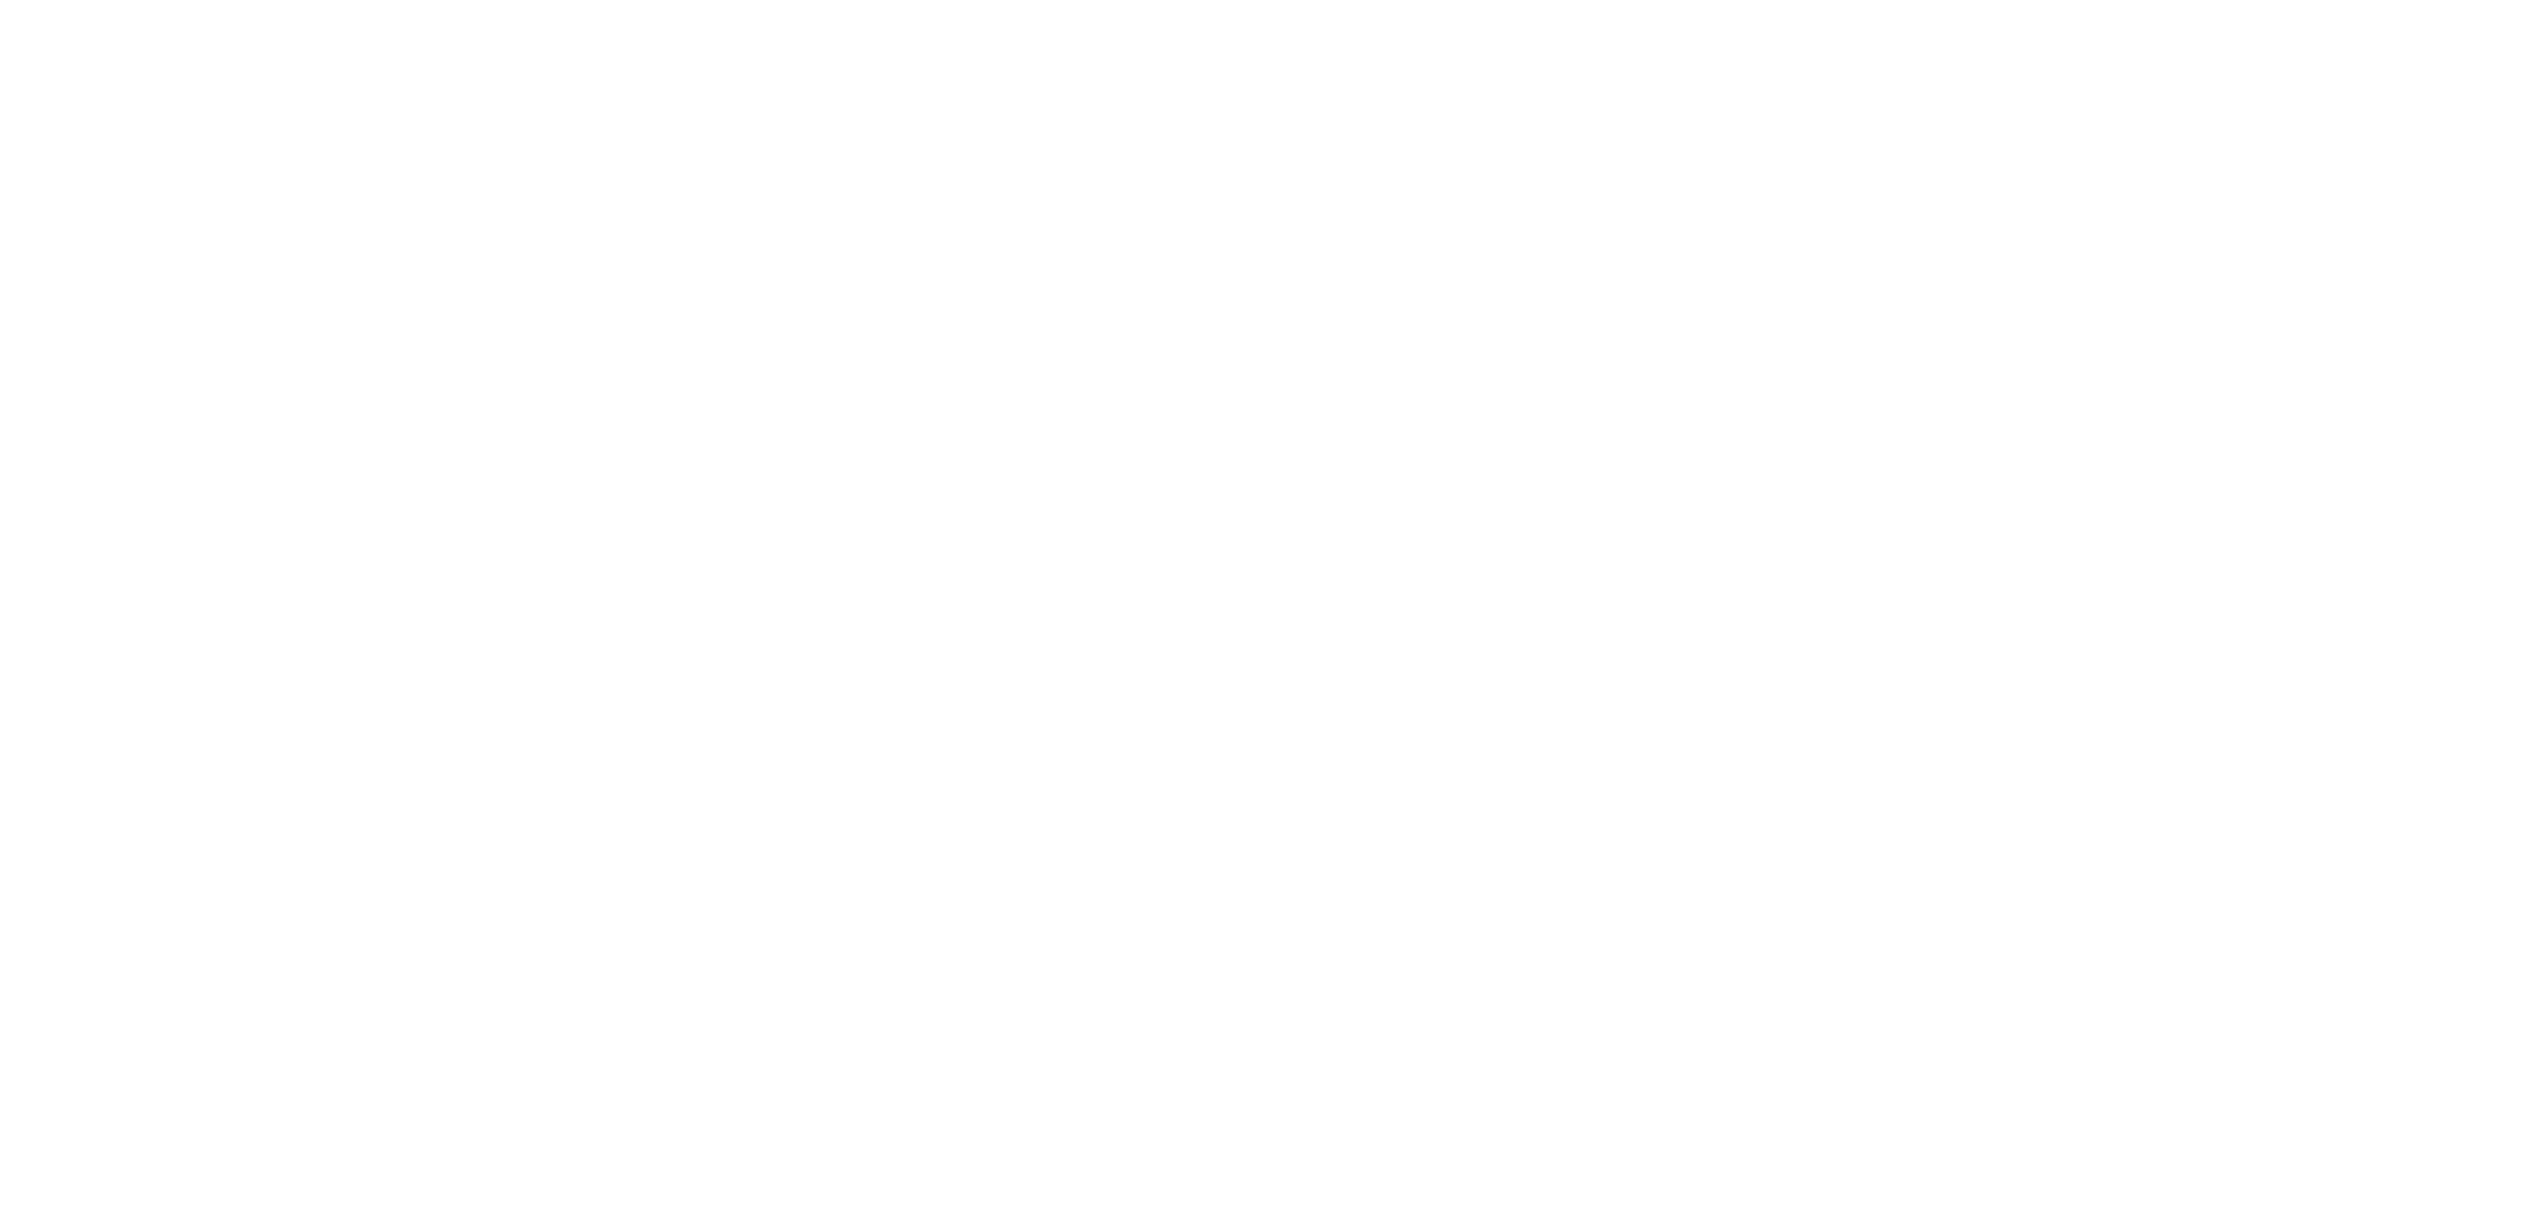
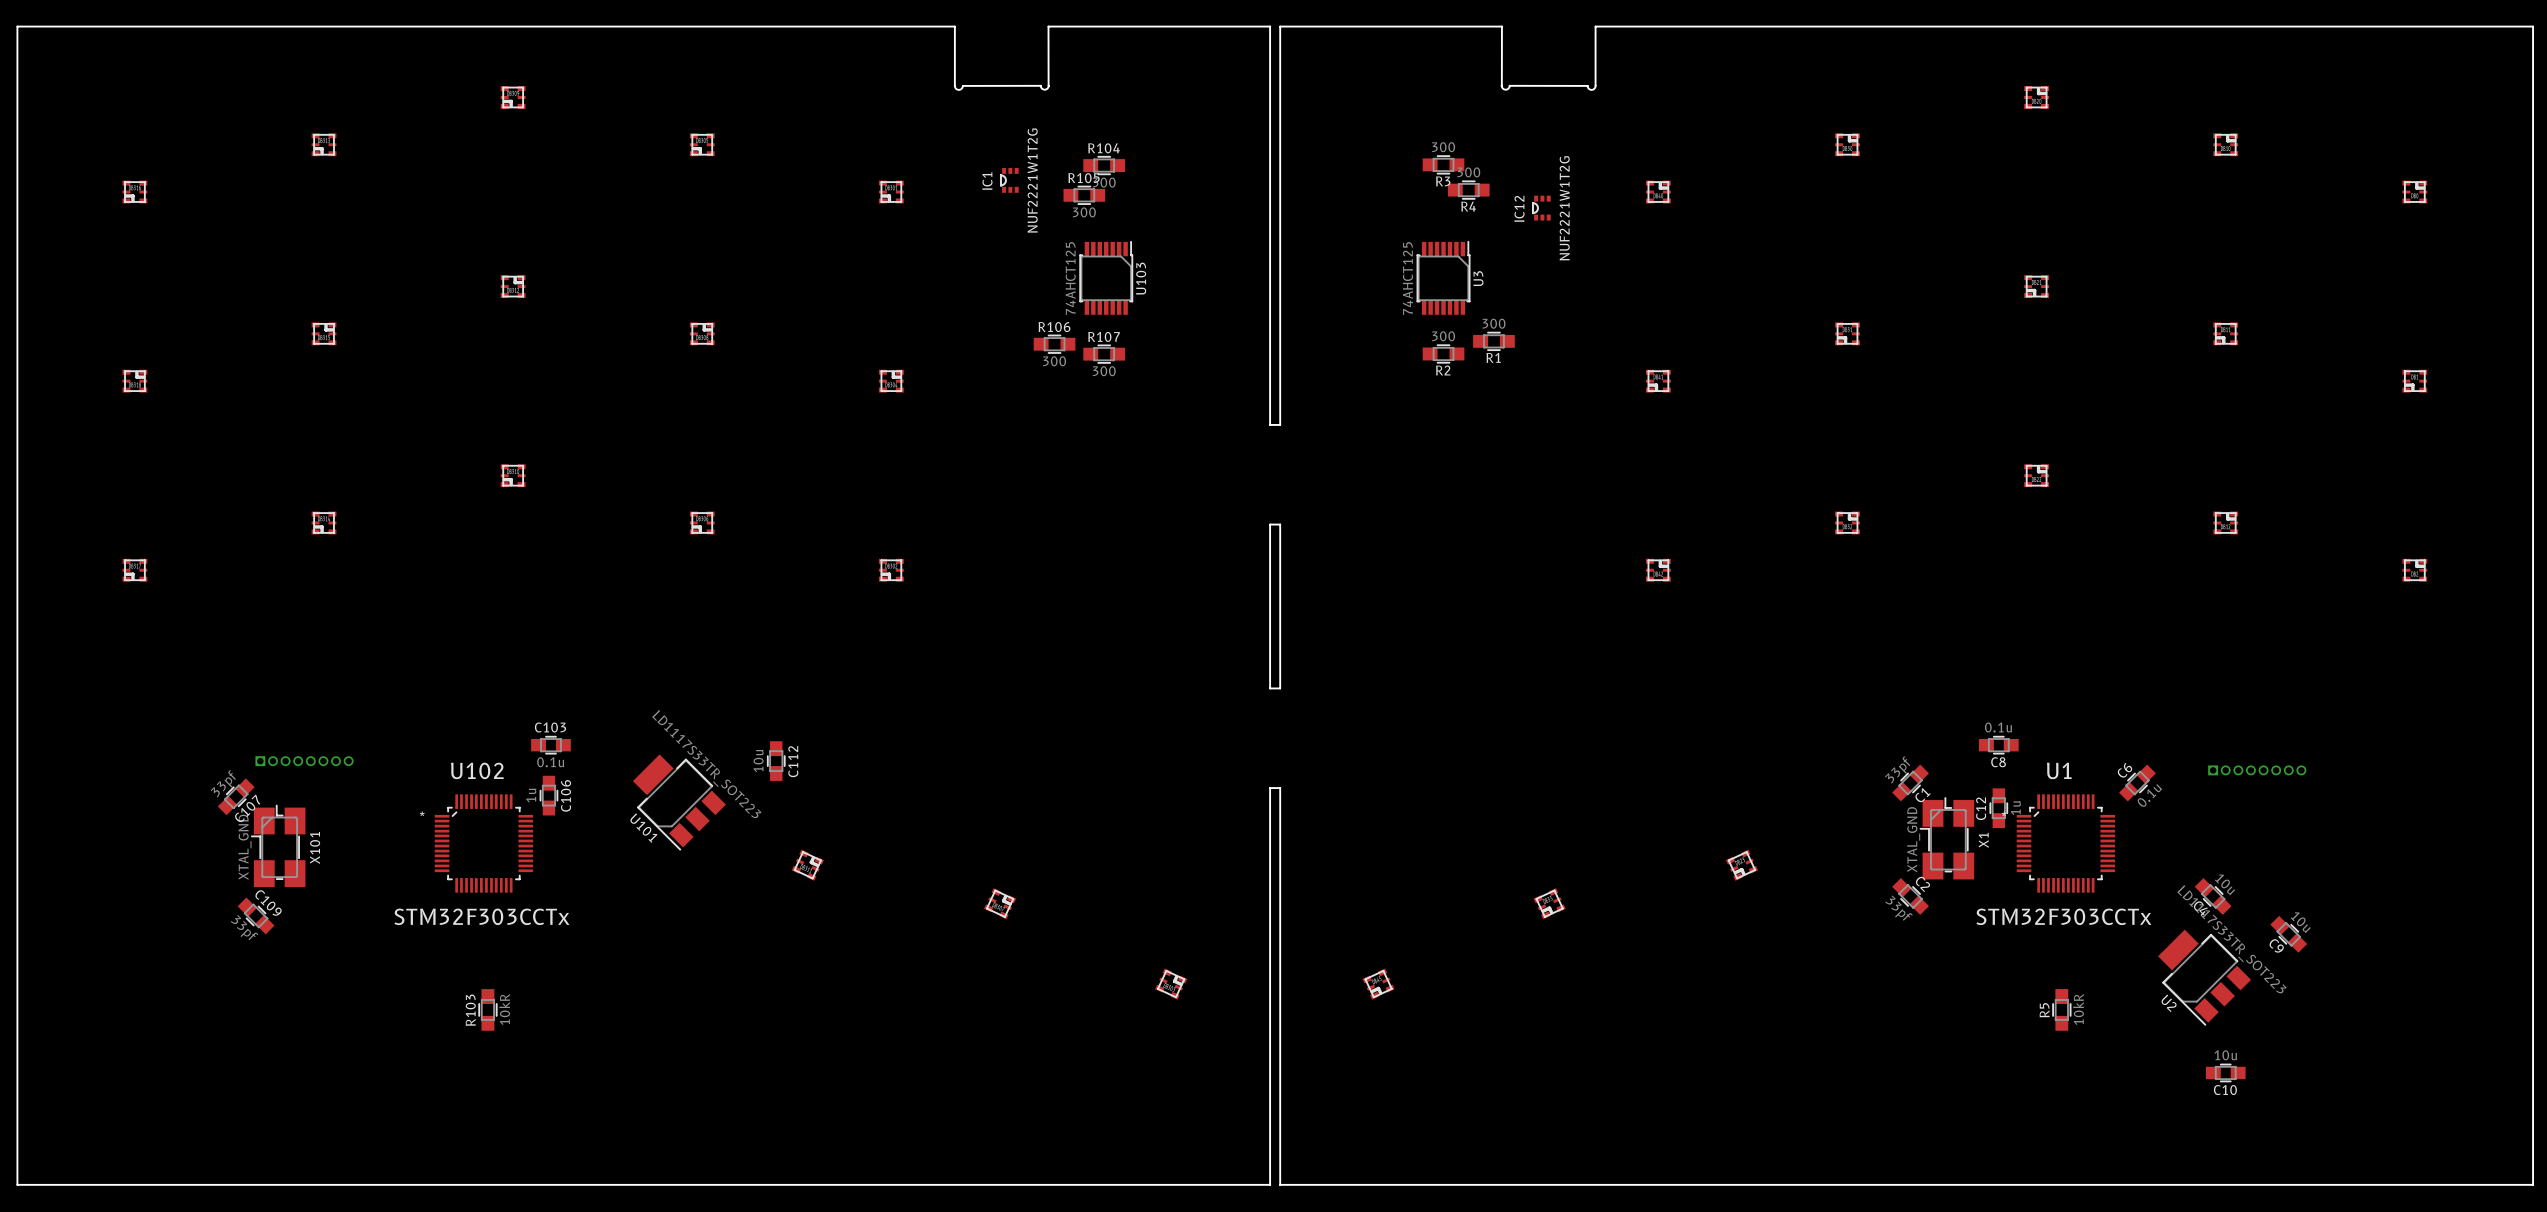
board edge: none -> (17, 26) (17, 1184) (1270, 1184)
board edge: none -> (17, 26) (954, 26) (954, 85)
board edge: none -> (1270, 26) (1270, 424) (1280, 424) (1280, 26) (1501, 26) (1501, 85)
board edge: none -> (1270, 26) (1048, 26) (1048, 85)
board edge: none -> (2532, 26) (1595, 26) (1595, 85)
board edge: none -> (2533, 26) (2533, 1184) (1280, 1184)
board edge: none -> (954, 85) (958, 89) (962, 85)
board edge: none -> (1040, 85) (1044, 89) (1048, 85)
board edge: none -> (1040, 85) (962, 85)
board edge: none -> (1501, 85) (1505, 89) (1509, 85)
board edge: none -> (1509, 85) (1587, 85)
board edge: none -> (1587, 85) (1591, 89) (1595, 85)
part: none -> (513, 97)
part: none -> (2036, 97)
part: none -> (324, 144)
part: none -> (702, 144)
part: none -> (1847, 144)
part: none -> (2225, 144)
R3: none -> 300 (1443, 164)
R104: none -> 300 (1104, 165)
IC1: none -> NUF2221W1T2G (1009, 180)
R4: none -> 300 (1468, 190)
part: none -> (134, 192)
part: none -> (891, 192)
part: none -> (1658, 192)
part: none -> (2414, 192)
R105: none -> 300 (1084, 195)
IC12: none -> NUF2221W1T2G (1541, 208)
U103: none -> 74AHCT125 (1106, 277)
U3: none -> 74AHCT125 (1443, 277)
part: none -> (513, 286)
part: none -> (2036, 286)
part: none -> (324, 333)
part: none -> (702, 333)
part: none -> (1847, 333)
part: none -> (2225, 333)
R1: none -> 300 (1493, 341)
R106: none -> 300 (1054, 344)
R2: none -> 300 (1443, 353)
R107: none -> 300 (1104, 354)
part: none -> (134, 381)
part: none -> (891, 381)
part: none -> (1658, 381)
part: none -> (2414, 381)
part: none -> (513, 475)
part: none -> (2036, 475)
part: none -> (324, 522)
part: none -> (702, 522)
part: none -> (1847, 522)
part: none -> (2225, 522)
board edge: none -> (1270, 524) (1280, 524) (1280, 688) (1270, 688) (1270, 524)
part: none -> (134, 570)
part: none -> (891, 570)
part: none -> (1658, 570)
part: none -> (2414, 570)
C103: none -> 0.1u (550, 745)
C8: none -> 0.1u (1998, 745)
part: none -> (304, 761)
C112: none -> 10u (776, 761)
part: none -> (2257, 770)
C1: none -> 33pf (1910, 783)
C6: none -> 0.1u (2137, 783)
C106: none -> 1u (548, 795)
C107: none -> 33pf (236, 796)
U101: none -> LD1117S33TR_SOT223 (679, 802)
C12: none -> 1u (1998, 808)
X1: none -> XTAL_GND (1947, 838)
U102: none -> STM32F303CCTx (483, 843)
U1: none -> STM32F303CCTx (2065, 843)
X101: none -> XTAL_GND (278, 846)
part: none -> (807, 865)
part: none -> (1741, 865)
C2: none -> 33pf (1910, 896)
C4: none -> 10u (2213, 896)
part: none -> (1000, 903)
part: none -> (1549, 903)
C109: none -> 33pf (256, 915)
C9: none -> 10u (2288, 934)
U2: none -> LD1117S33TR_SOT223 (2204, 977)
part: none -> (1171, 984)
part: none -> (1378, 984)
R103: none -> 10kR (487, 1009)
R5: none -> 10kR (2061, 1009)
C10: none -> 10u (2225, 1072)
board edge: none -> (1270, 1185) (1270, 788) (1280, 788) (1280, 1185)

